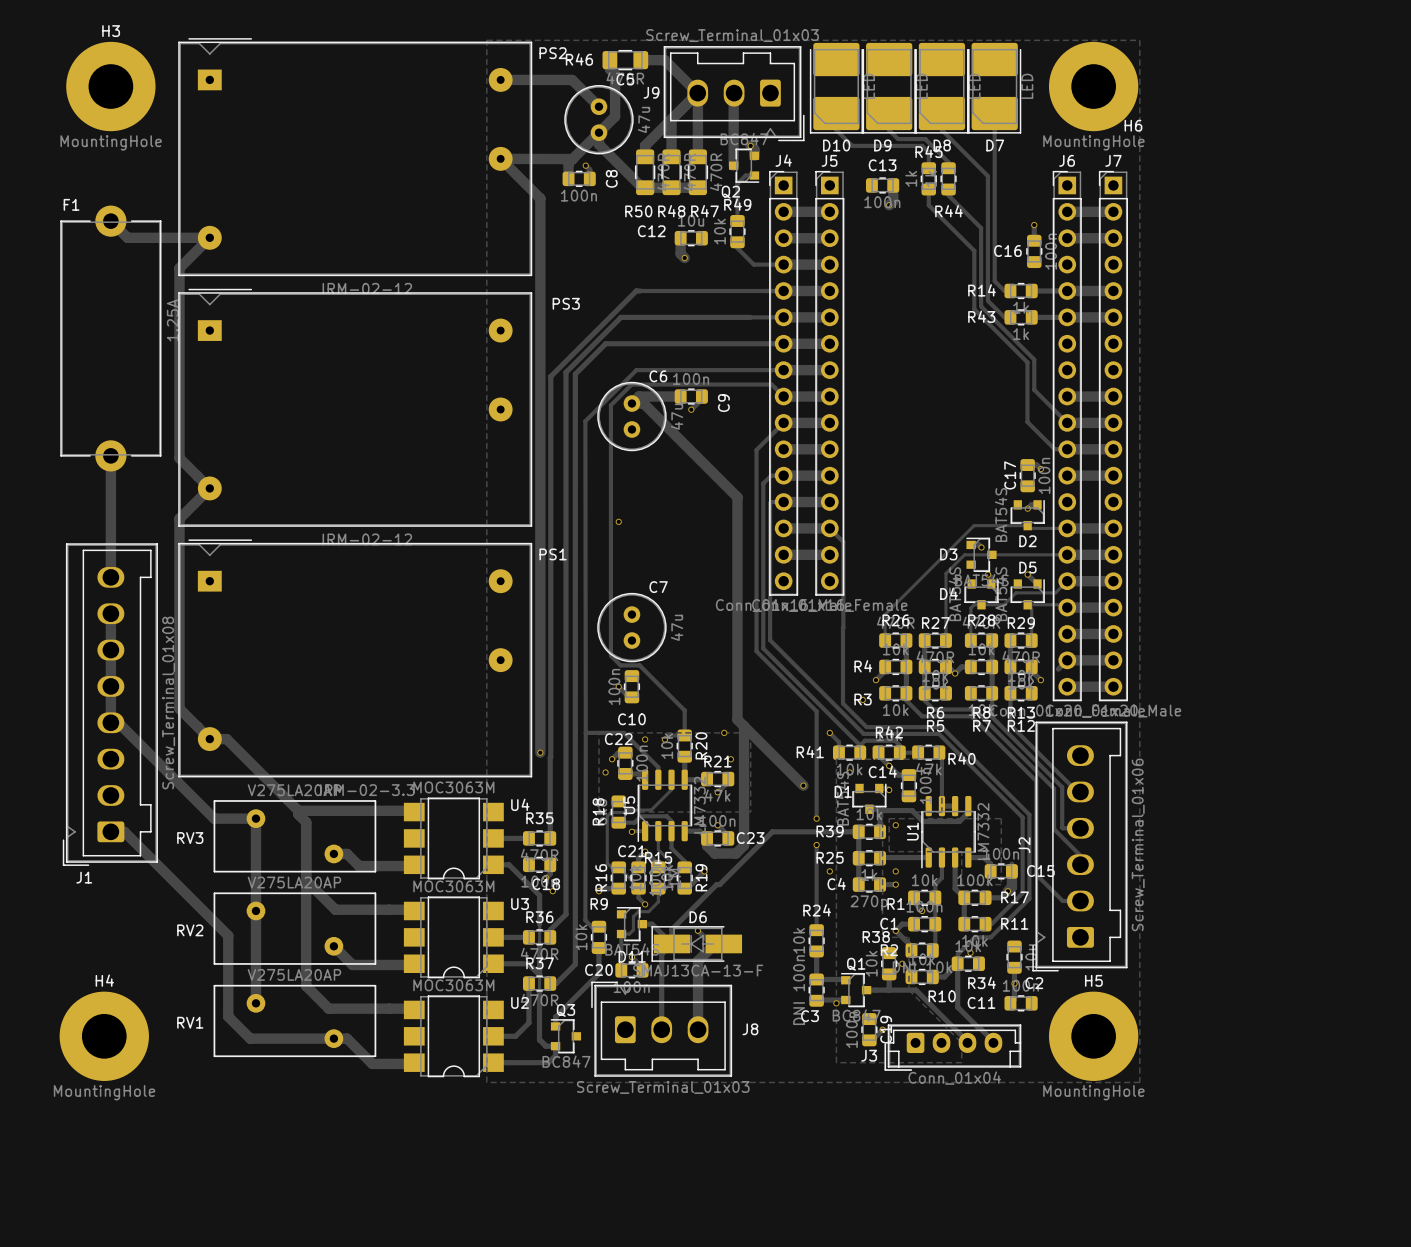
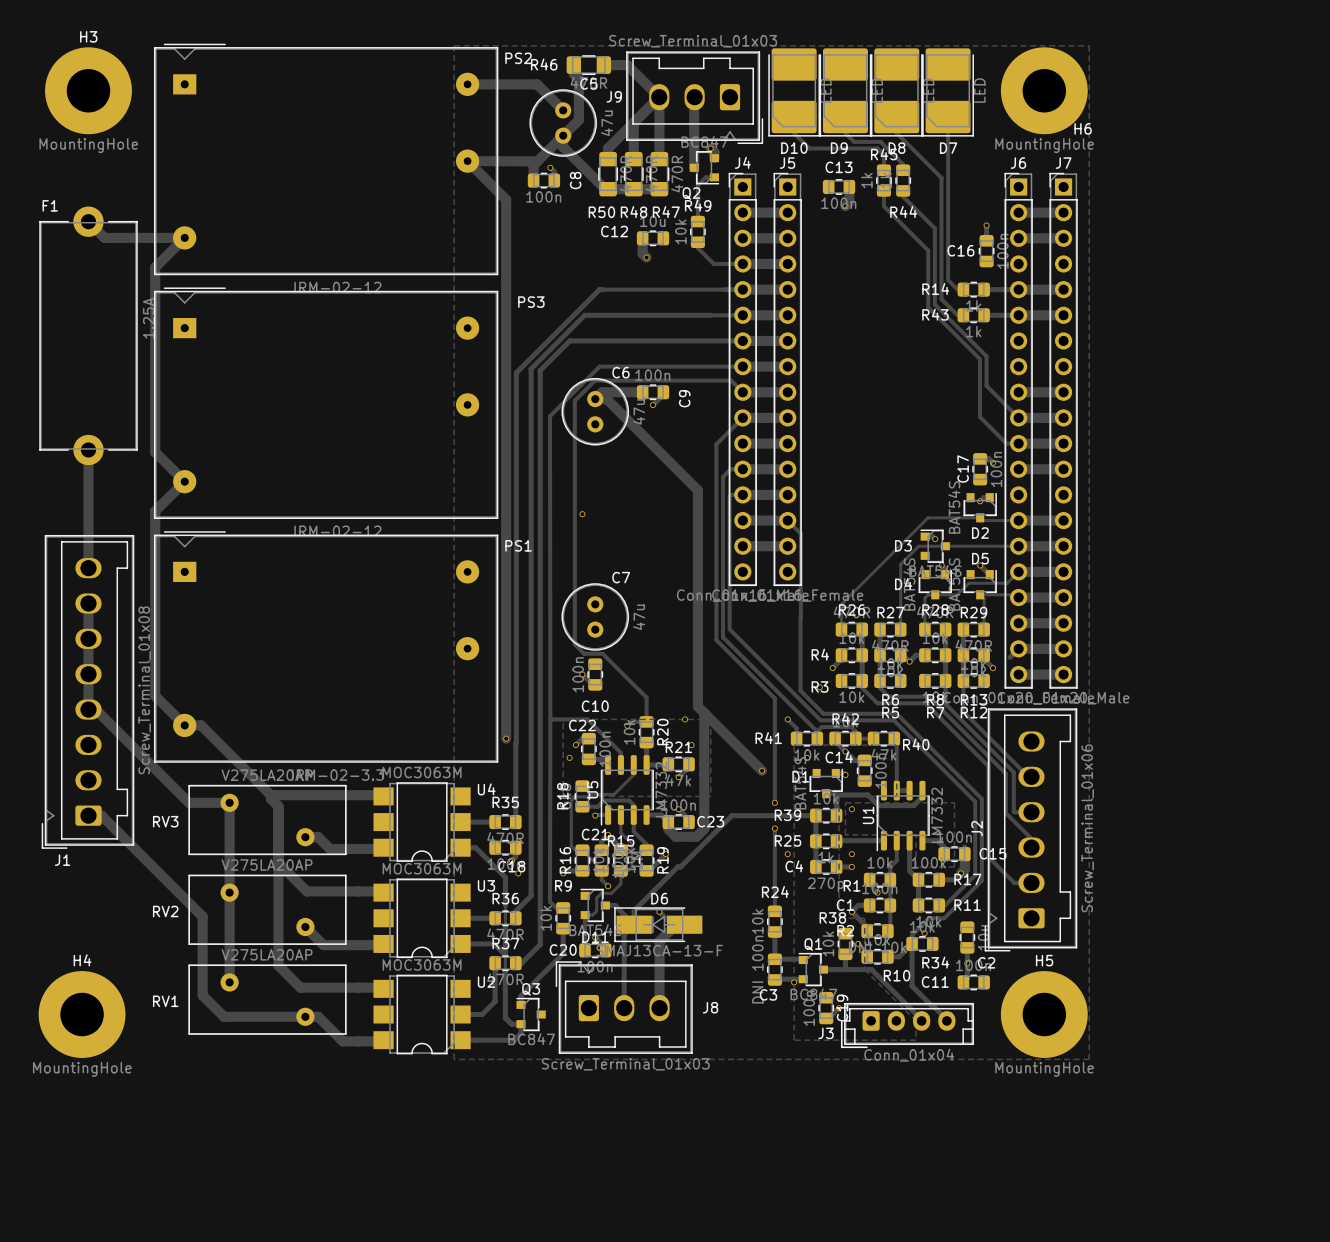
via: (645, 739) -> none

